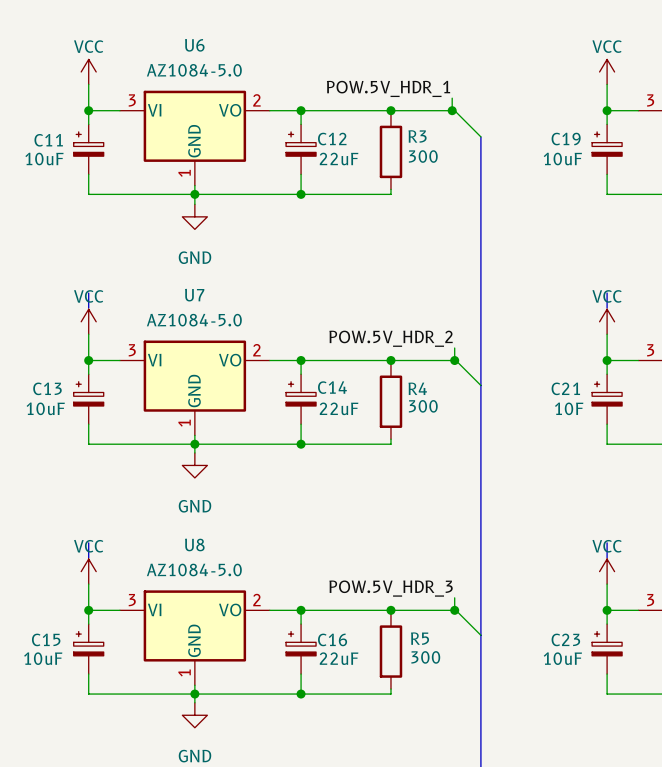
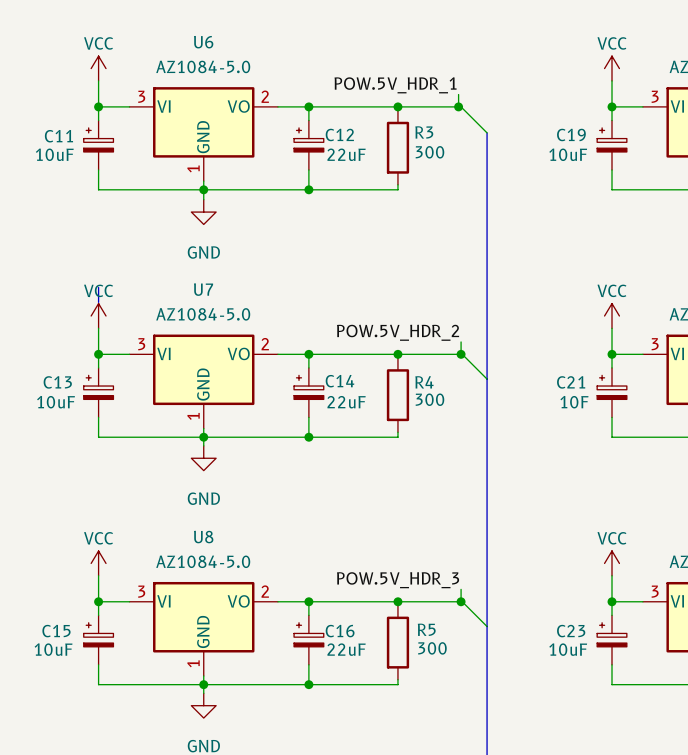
line: (607, 293) (607, 308) -> none
line: (88, 542) (88, 557) -> none
line: (607, 542) (607, 557) -> none

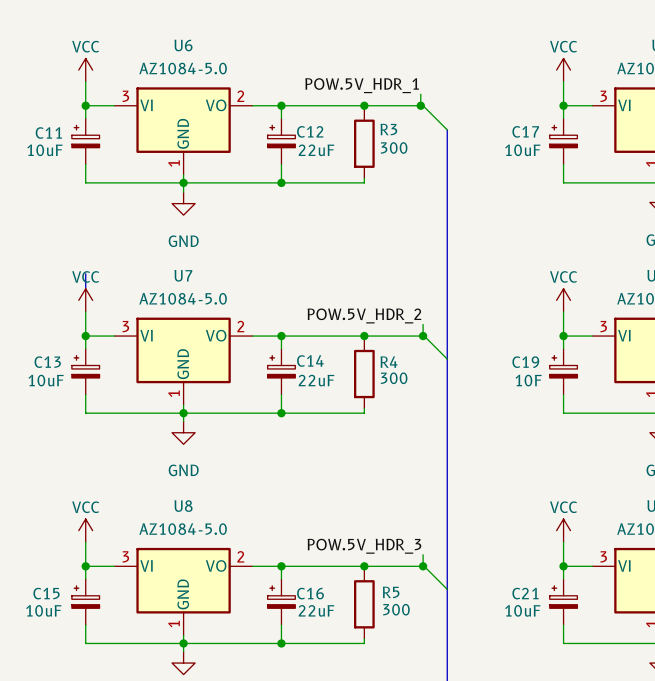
C19 name: C19 (571, 134) -> C17 (525, 131)
C21 name: C21 (571, 382) -> C19 (525, 362)
C23 name: C23 (571, 631) -> C21 (525, 593)

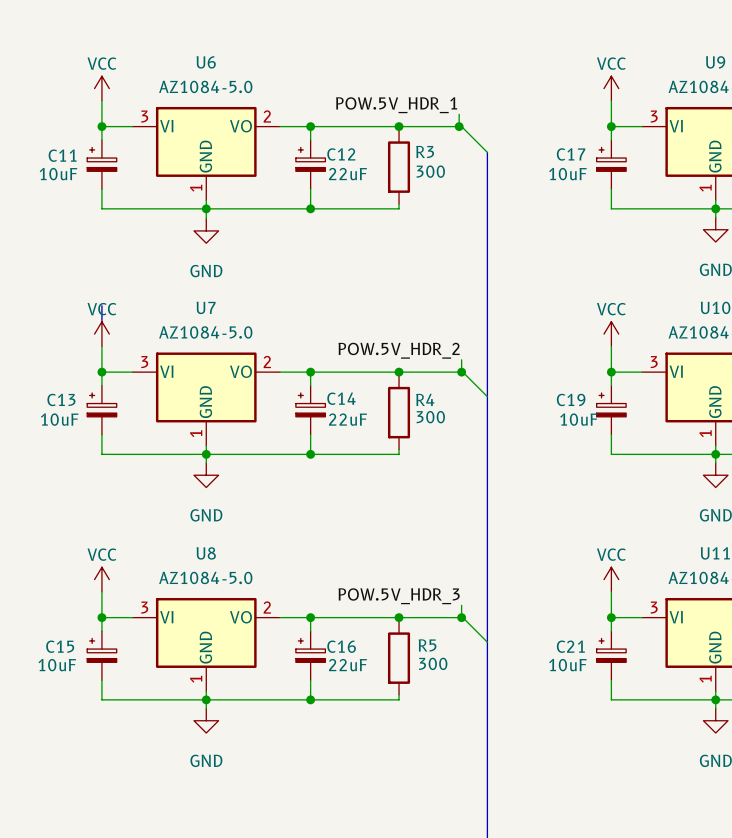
C19 value: 10F (528, 380) -> 10uF (578, 419)

